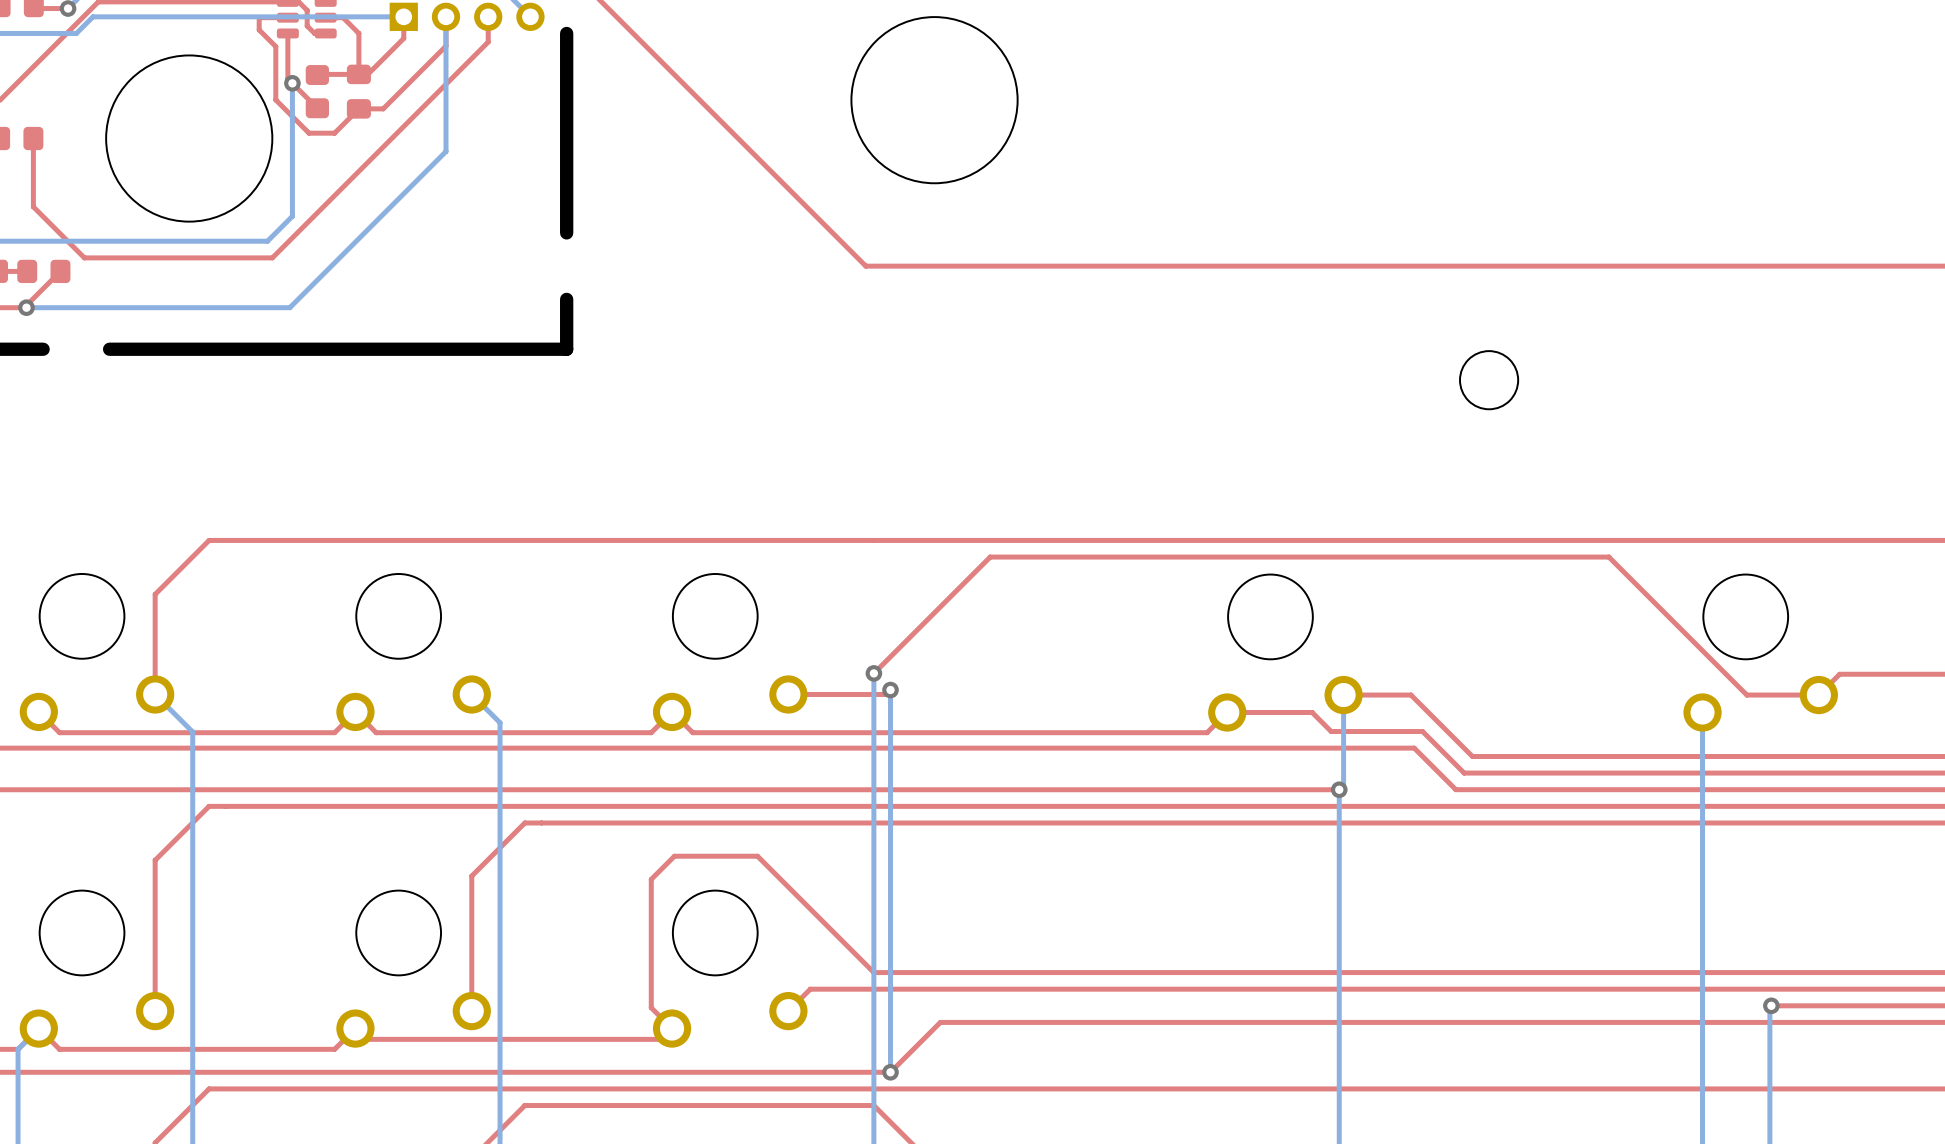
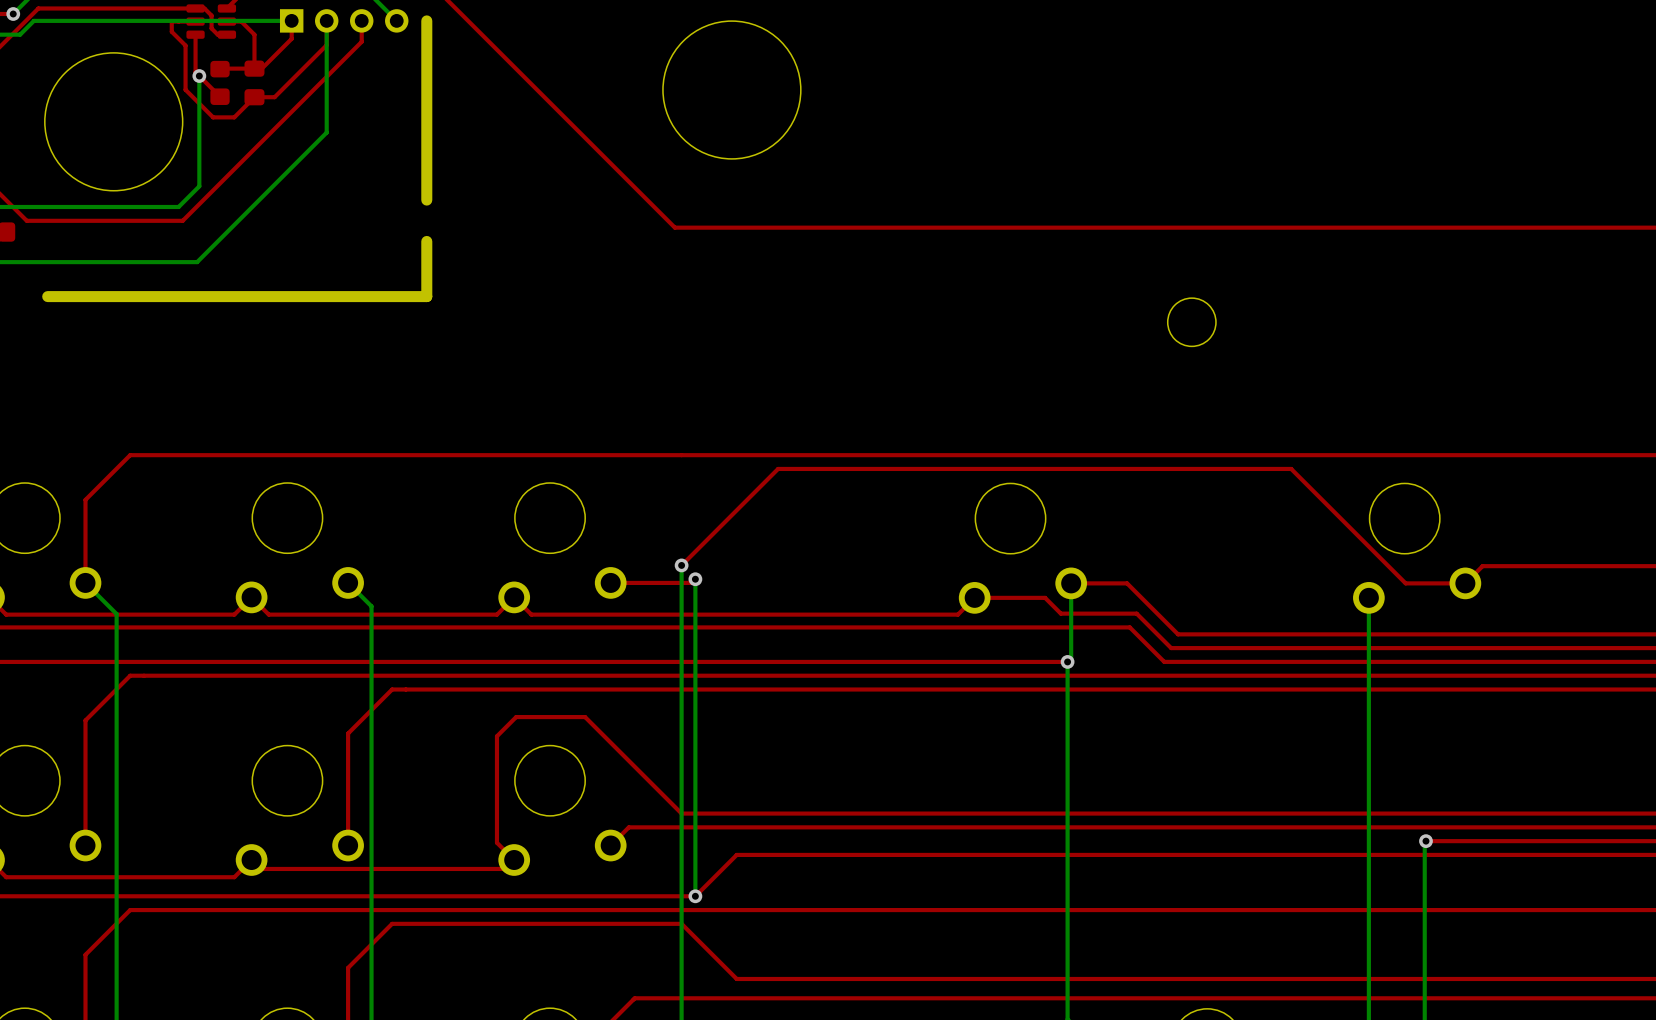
board edge: none -> (426, 20) (426, 34)
board edge: none -> (426, 241) (426, 255)

